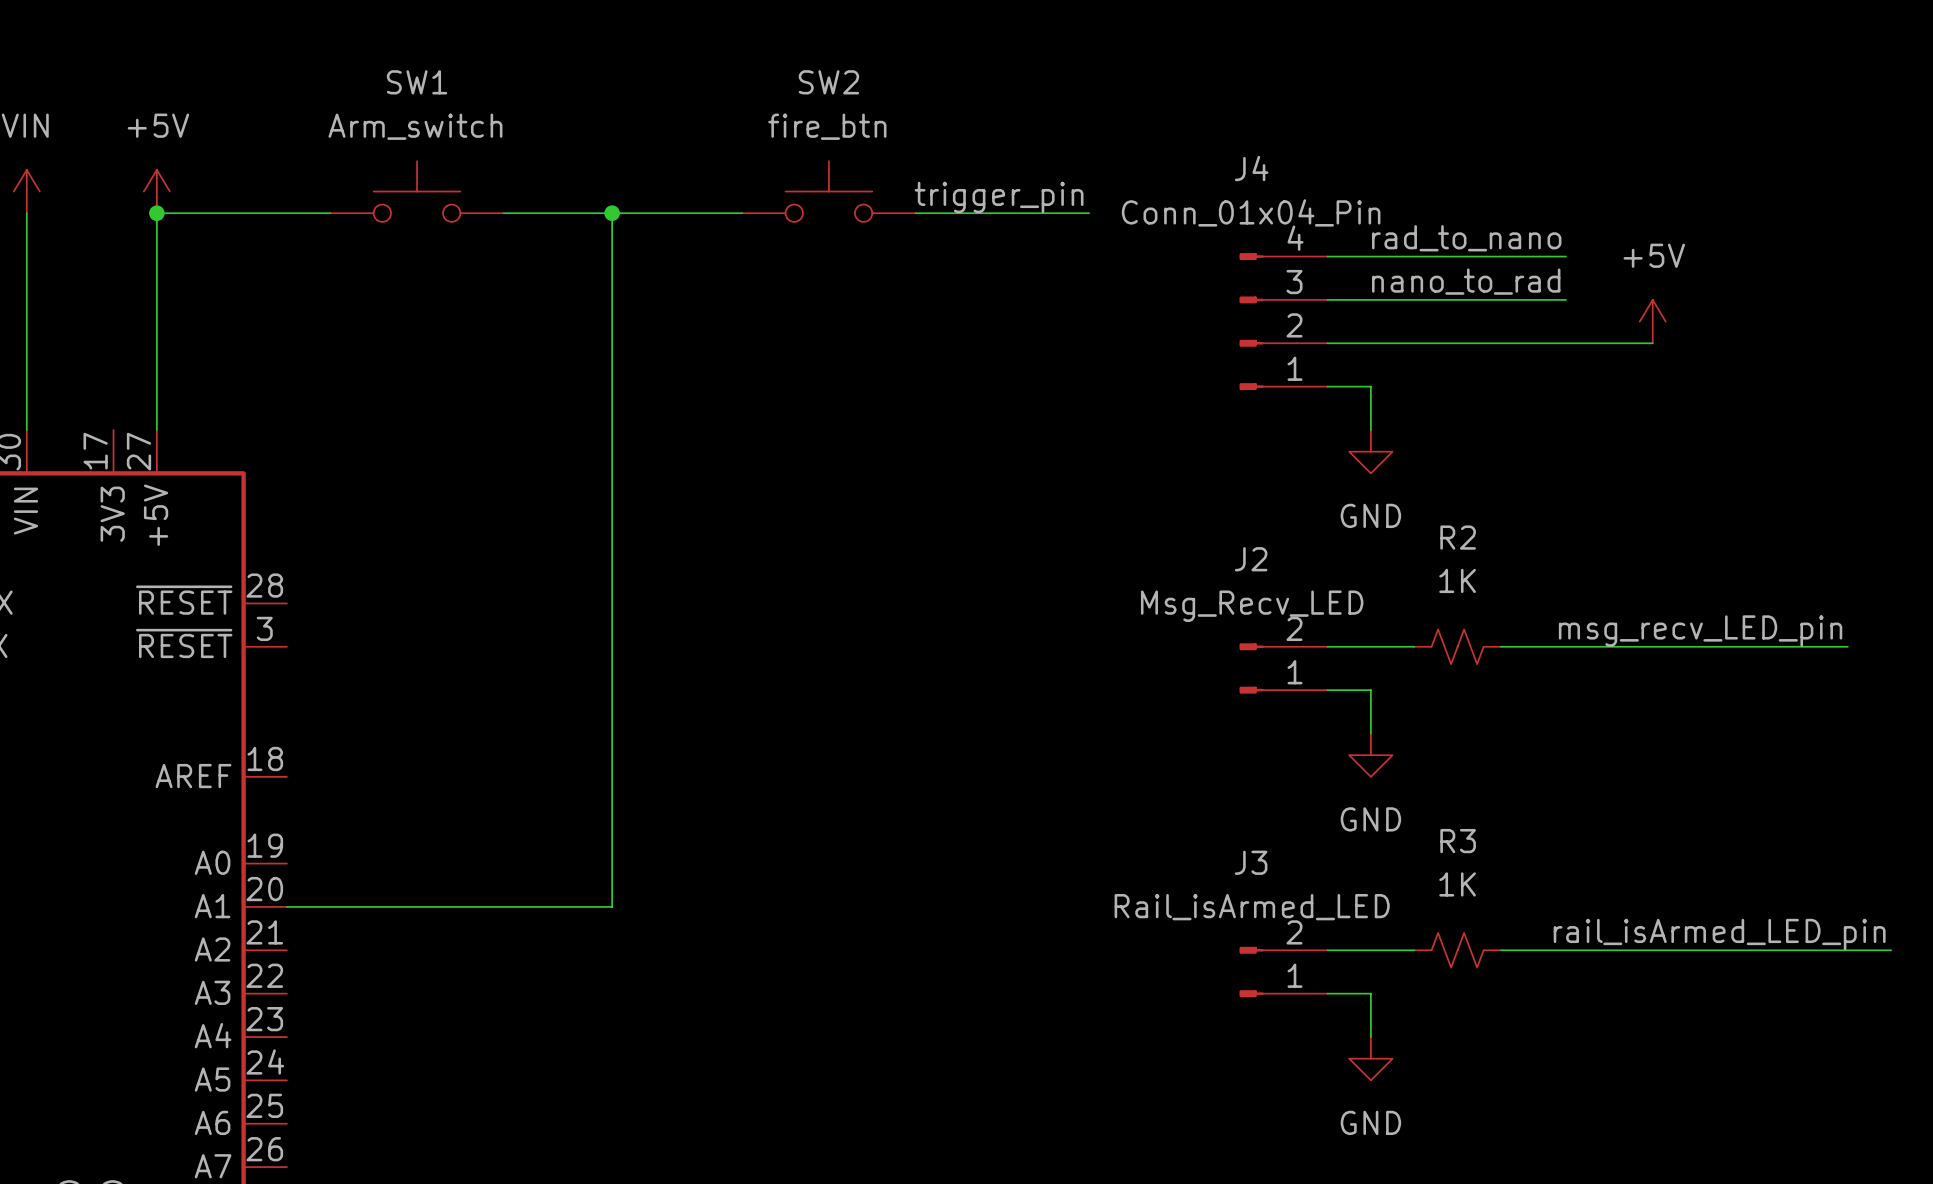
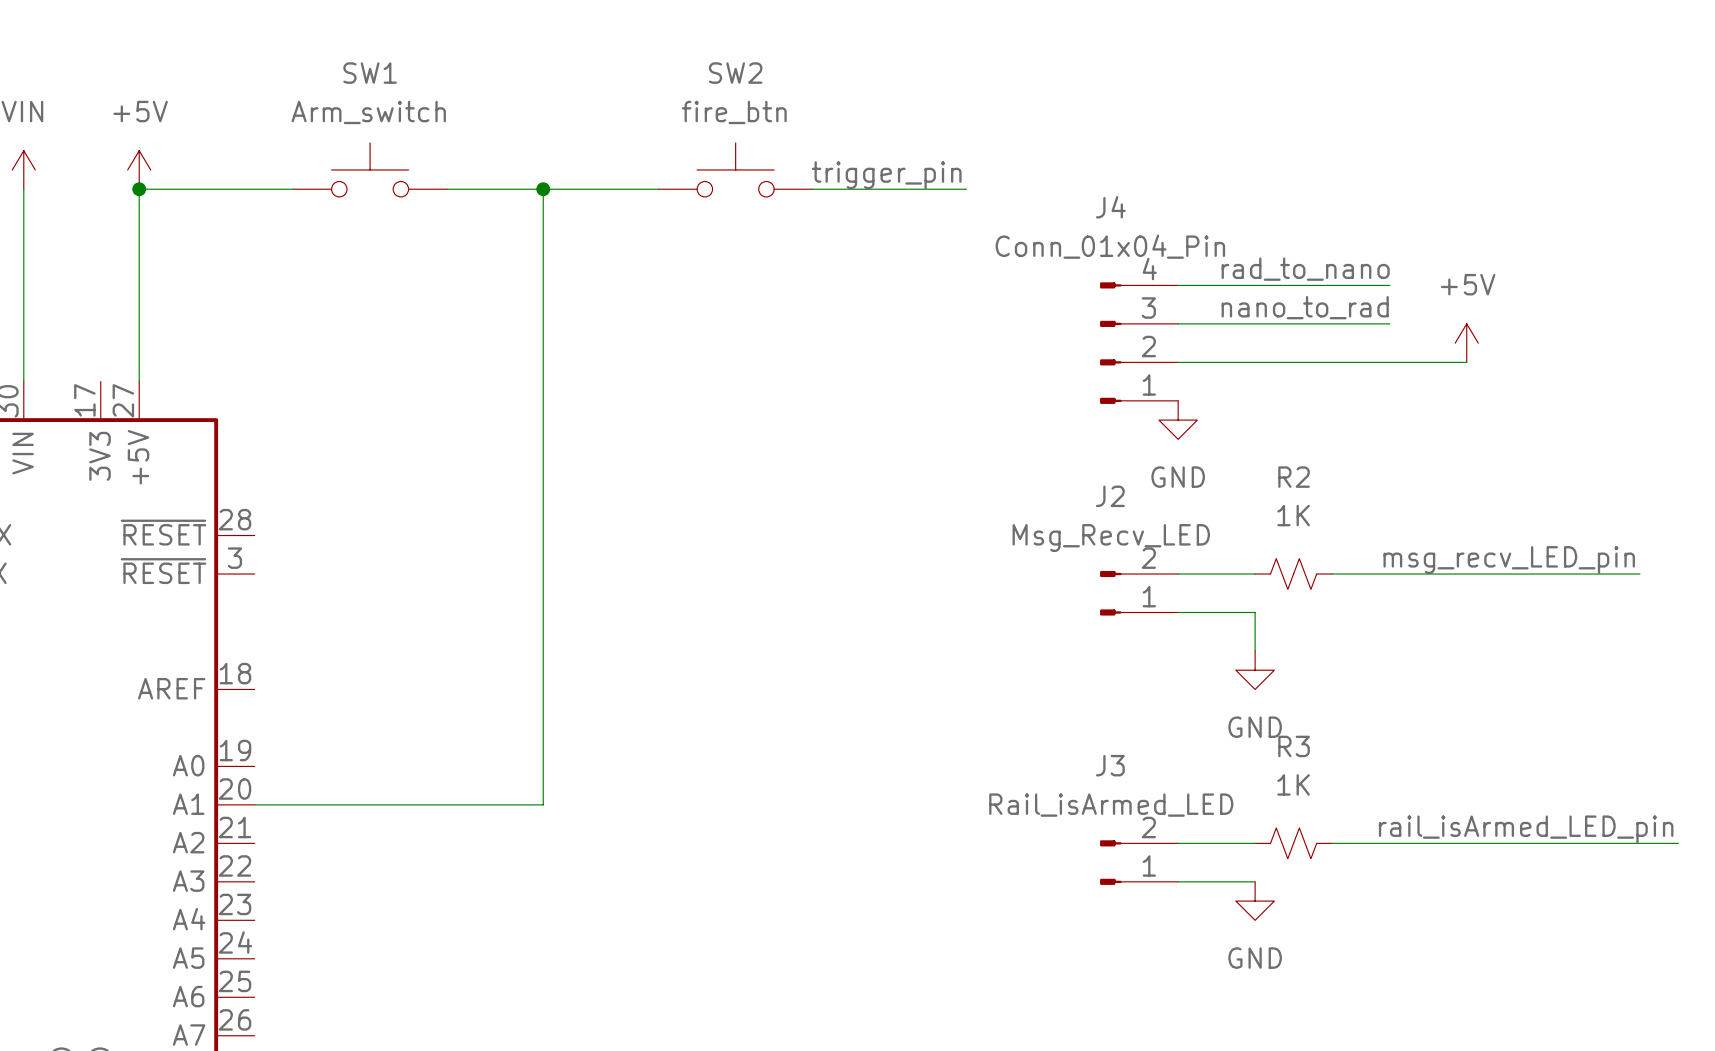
label position: rad_to_nano (1466, 238) -> rad_to_nano (1305, 269)
wire: (1327, 256) (1566, 256) -> (1178, 285) (1389, 285)
label position: nano_to_rad (1466, 281) -> nano_to_rad (1305, 307)
wire: (1327, 299) (1566, 299) -> (1178, 323) (1389, 323)
J4 position: (1283, 321) -> (1139, 343)
power symbol position: +5V (1652, 321) -> +5V (1466, 343)
wire: (1327, 343) (1652, 343) -> (1178, 362) (1466, 362)
wire: (1327, 386) (1370, 386) (1370, 430) -> none
power symbol position: GND (1370, 451) -> GND (1178, 420)
wire: (1370, 690) (1370, 733) -> (1216, 612) (1255, 612) (1255, 650)
power symbol position: GND (1370, 755) -> GND (1255, 670)
wire: (1370, 993) (1370, 1037) -> (1216, 881) (1255, 881)
power symbol position: GND (1370, 1058) -> GND (1255, 901)

